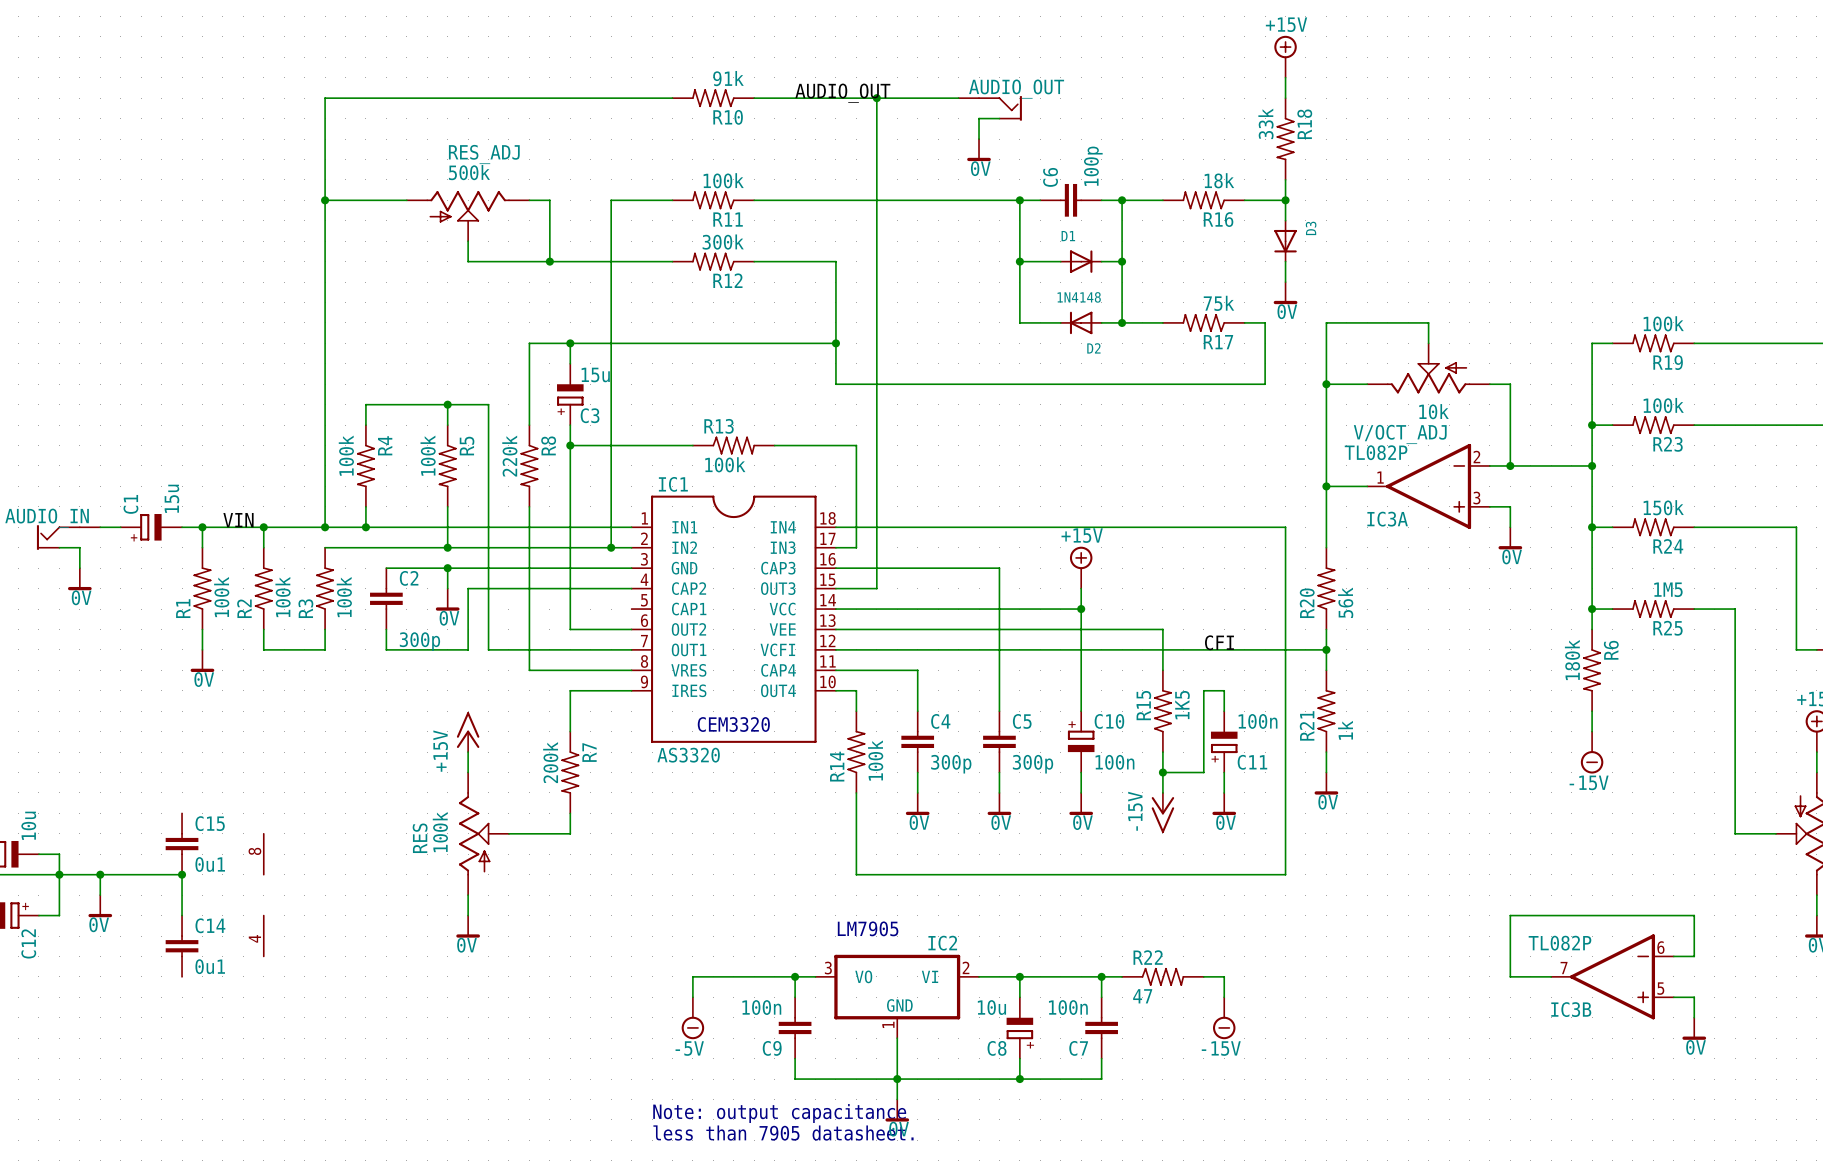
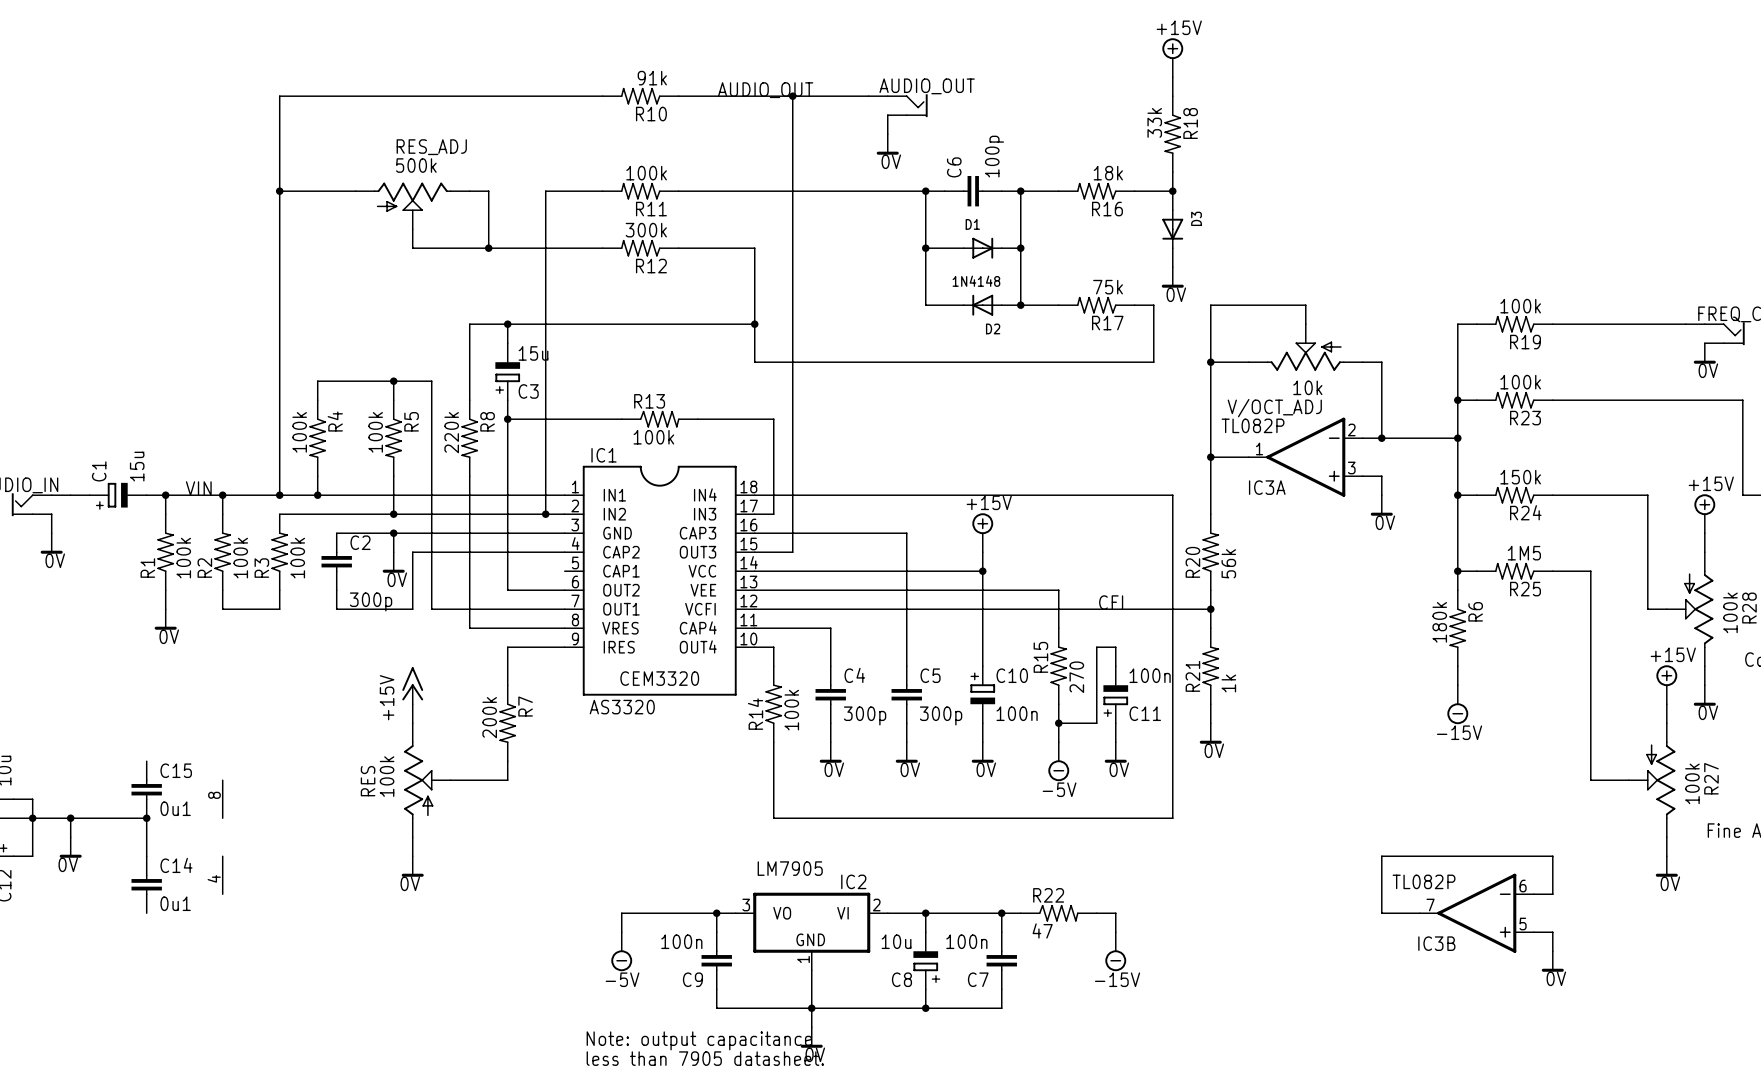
R15 value: 1K5 (1182, 705) -> 270 (1076, 677)
power symbol: -15V (1162, 812) -> -5V (1058, 761)

